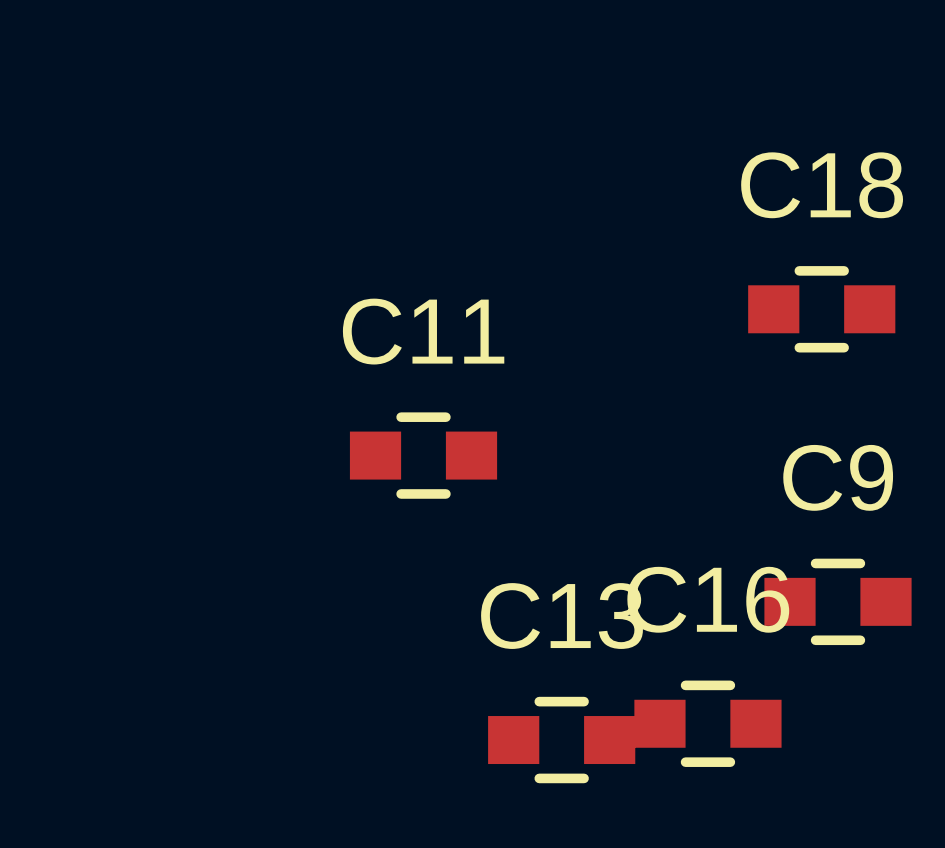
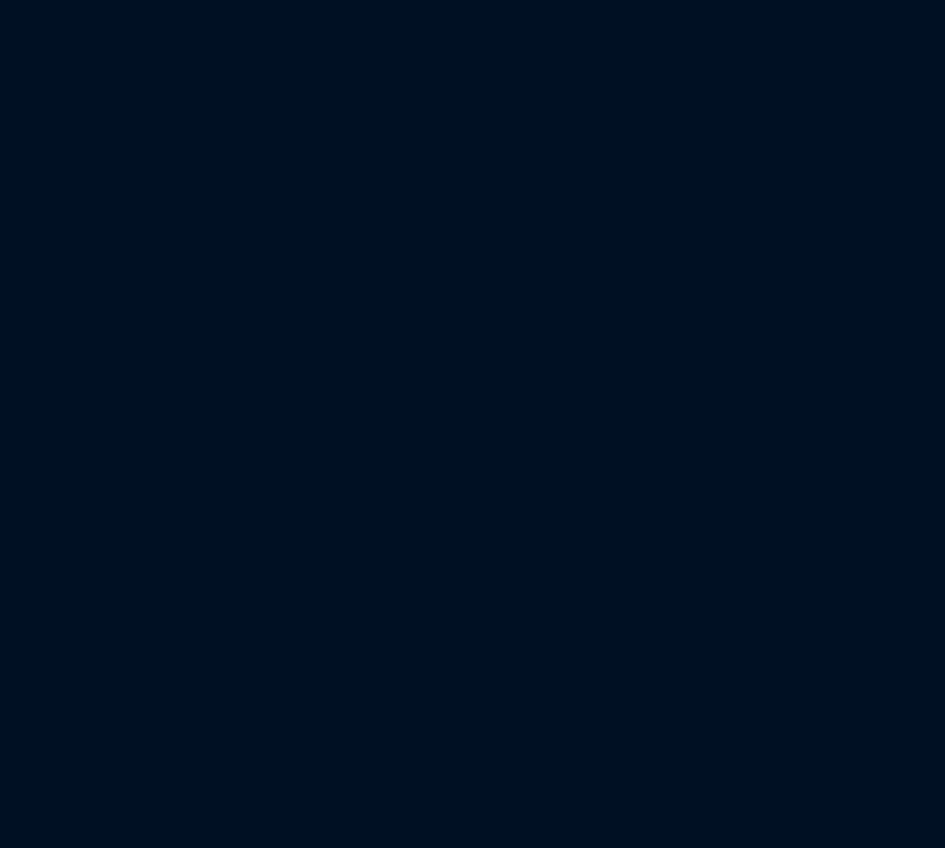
C18: (821, 309) -> none
C11: (423, 455) -> none
C9: (837, 601) -> none
C16: (707, 723) -> none
C13: (561, 740) -> none

